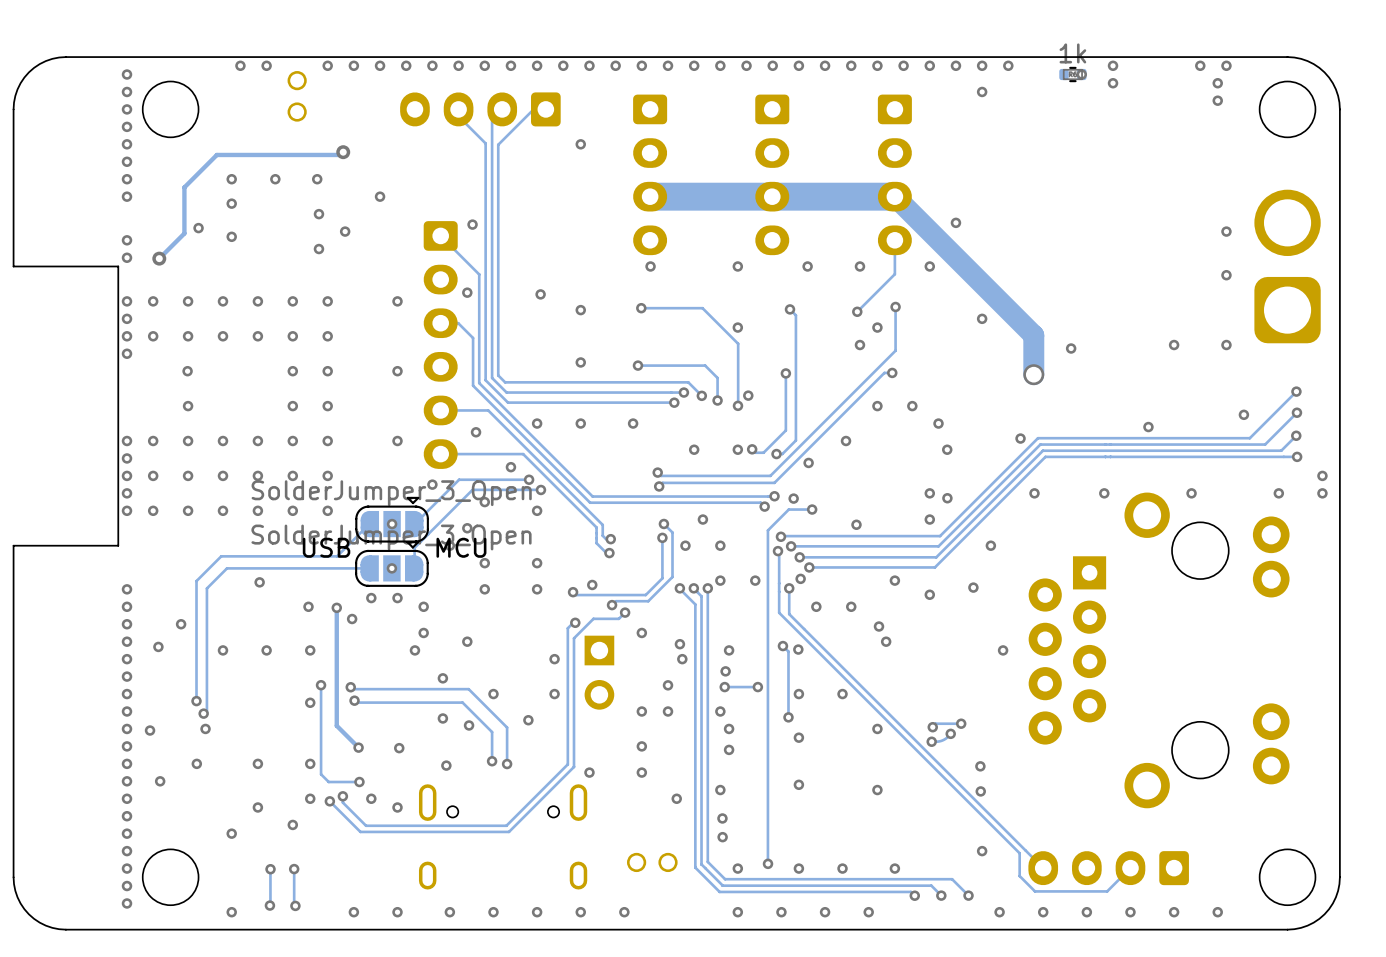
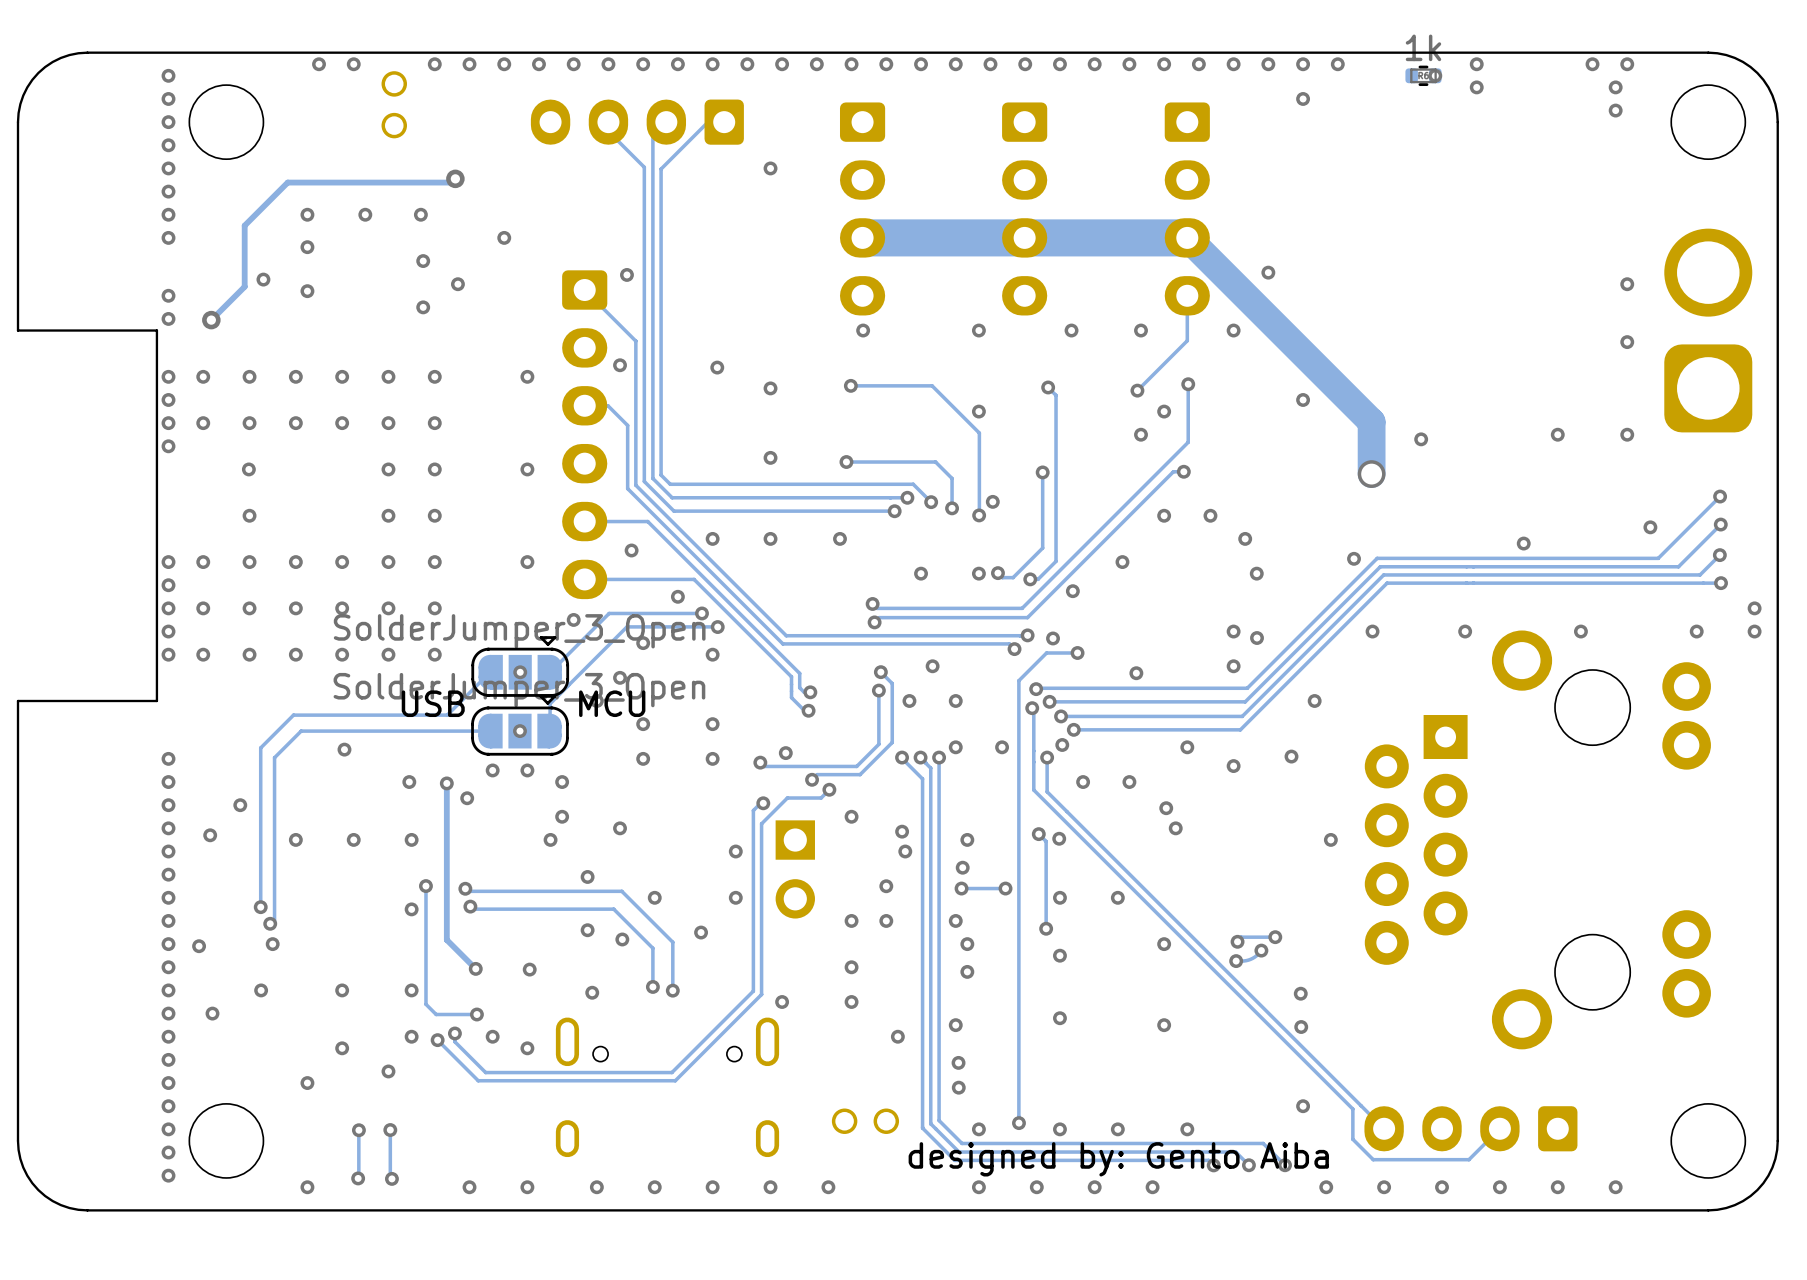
text: none -> designed by: Gento Aiba (1118, 1159)

